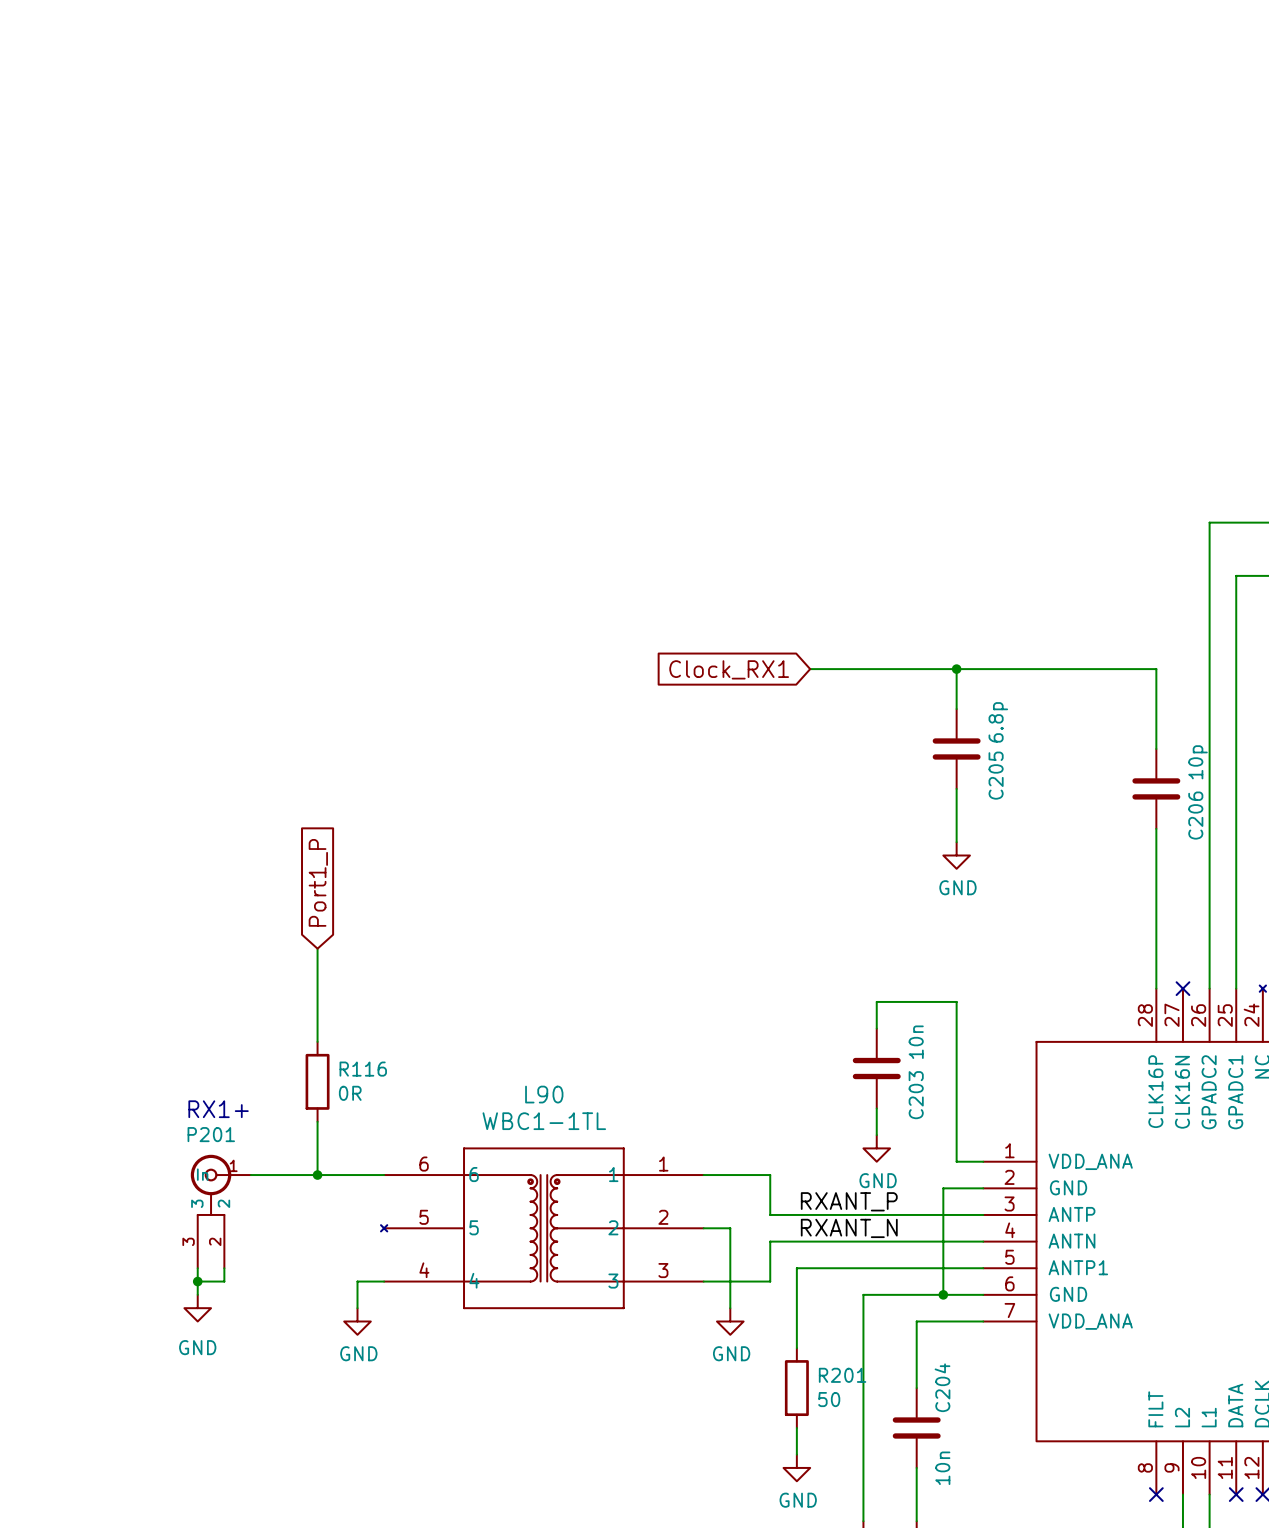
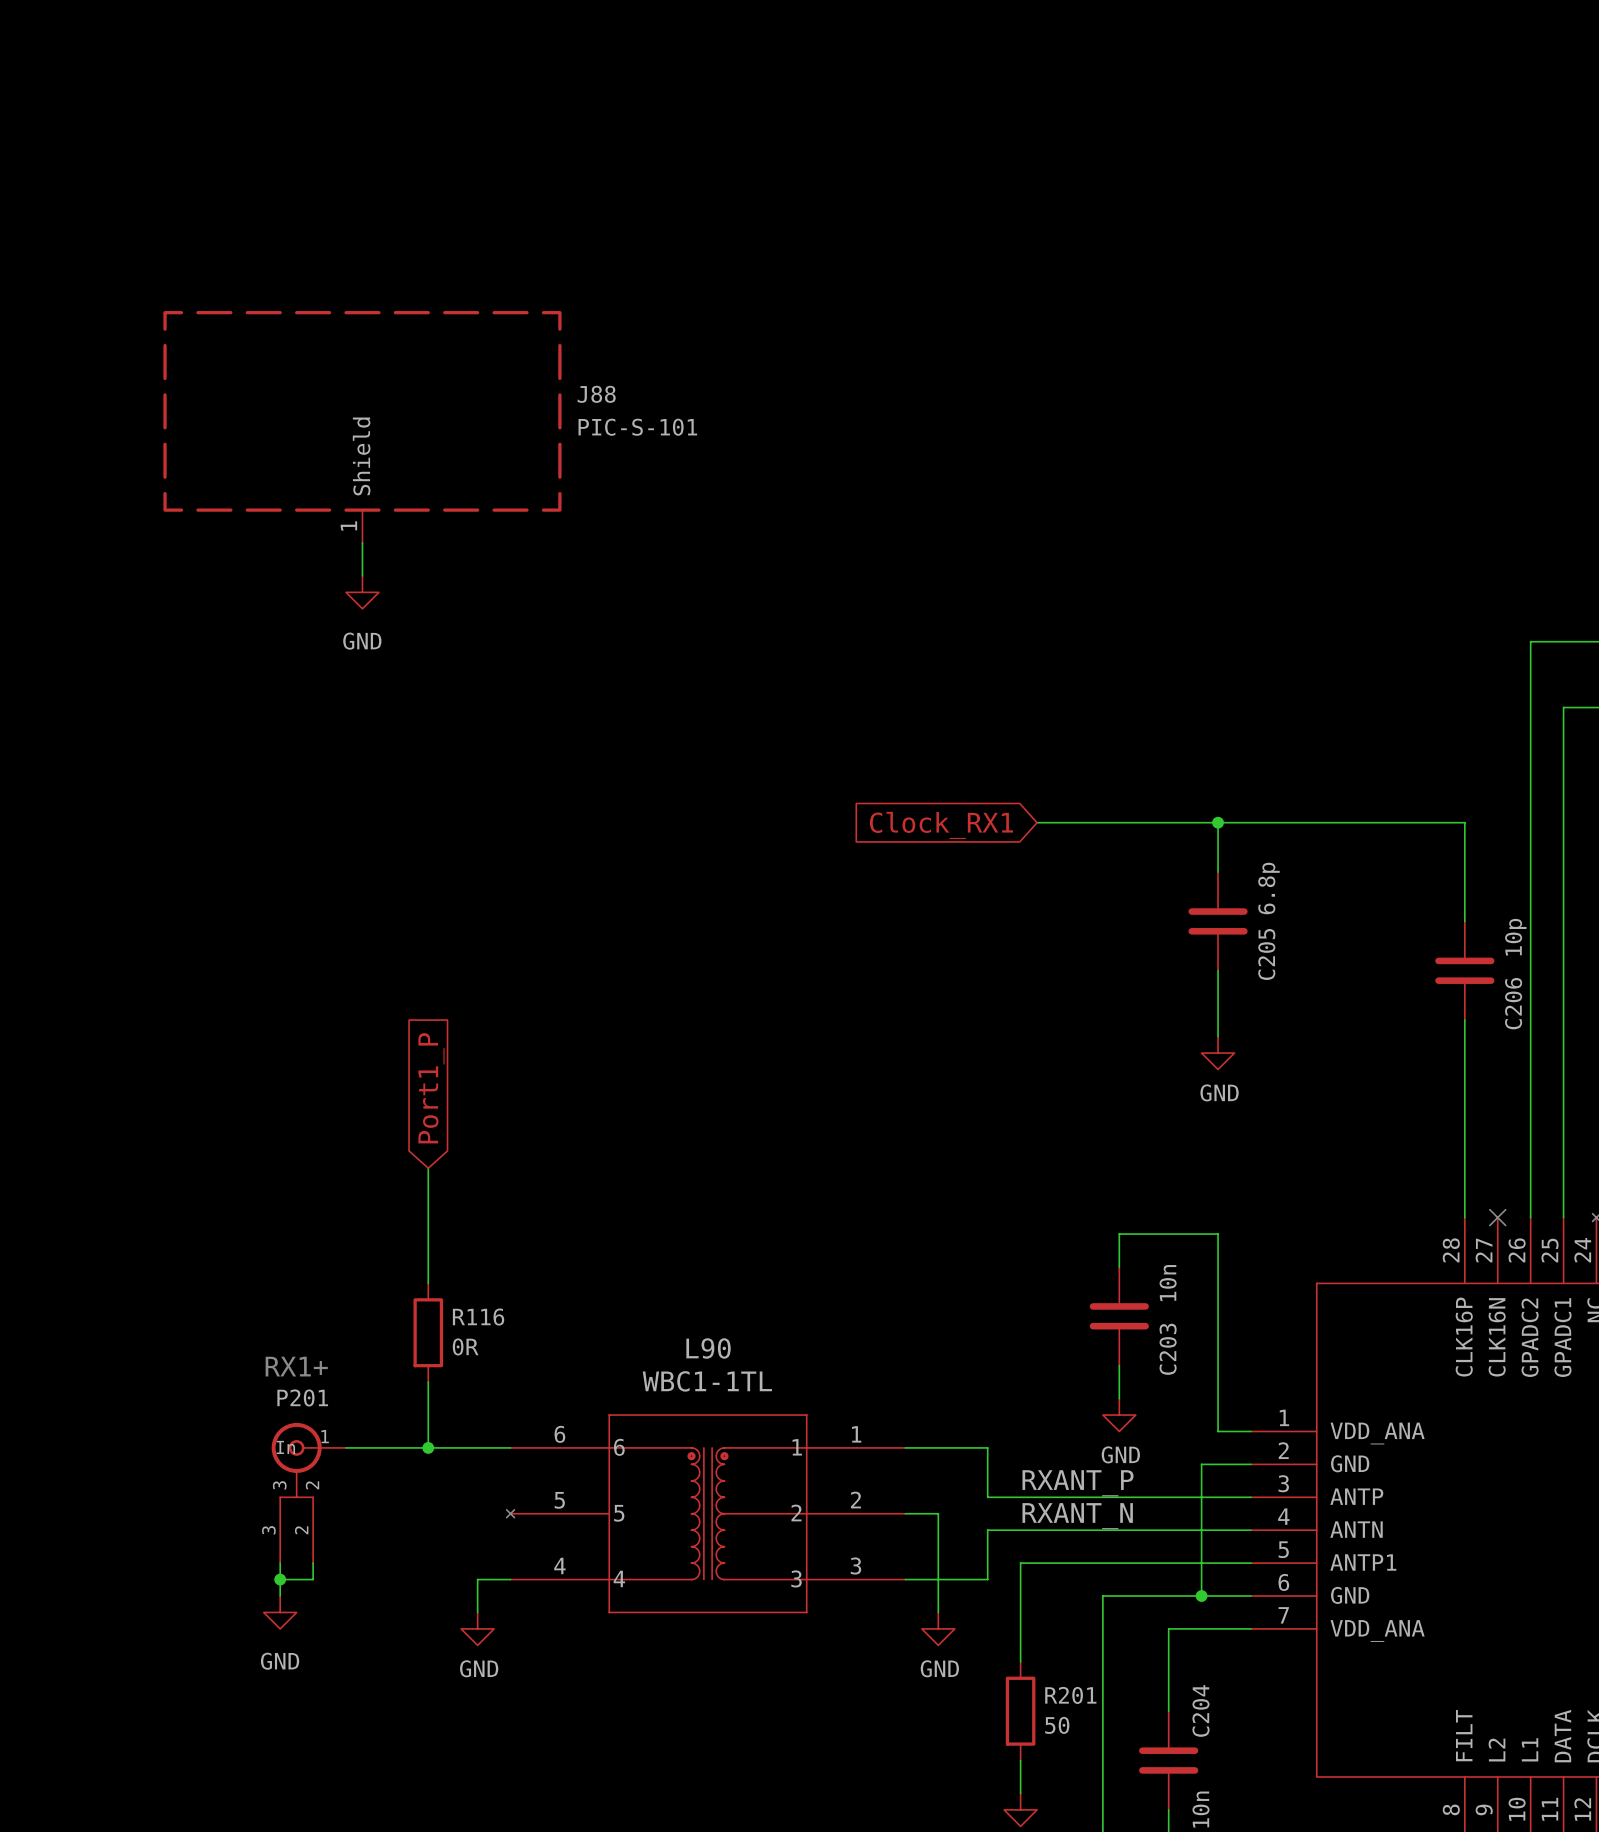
J88: none -> PIC-S-101 (362, 427)
wire: none -> (362, 543) (362, 575)
power symbol: none -> GND (362, 592)

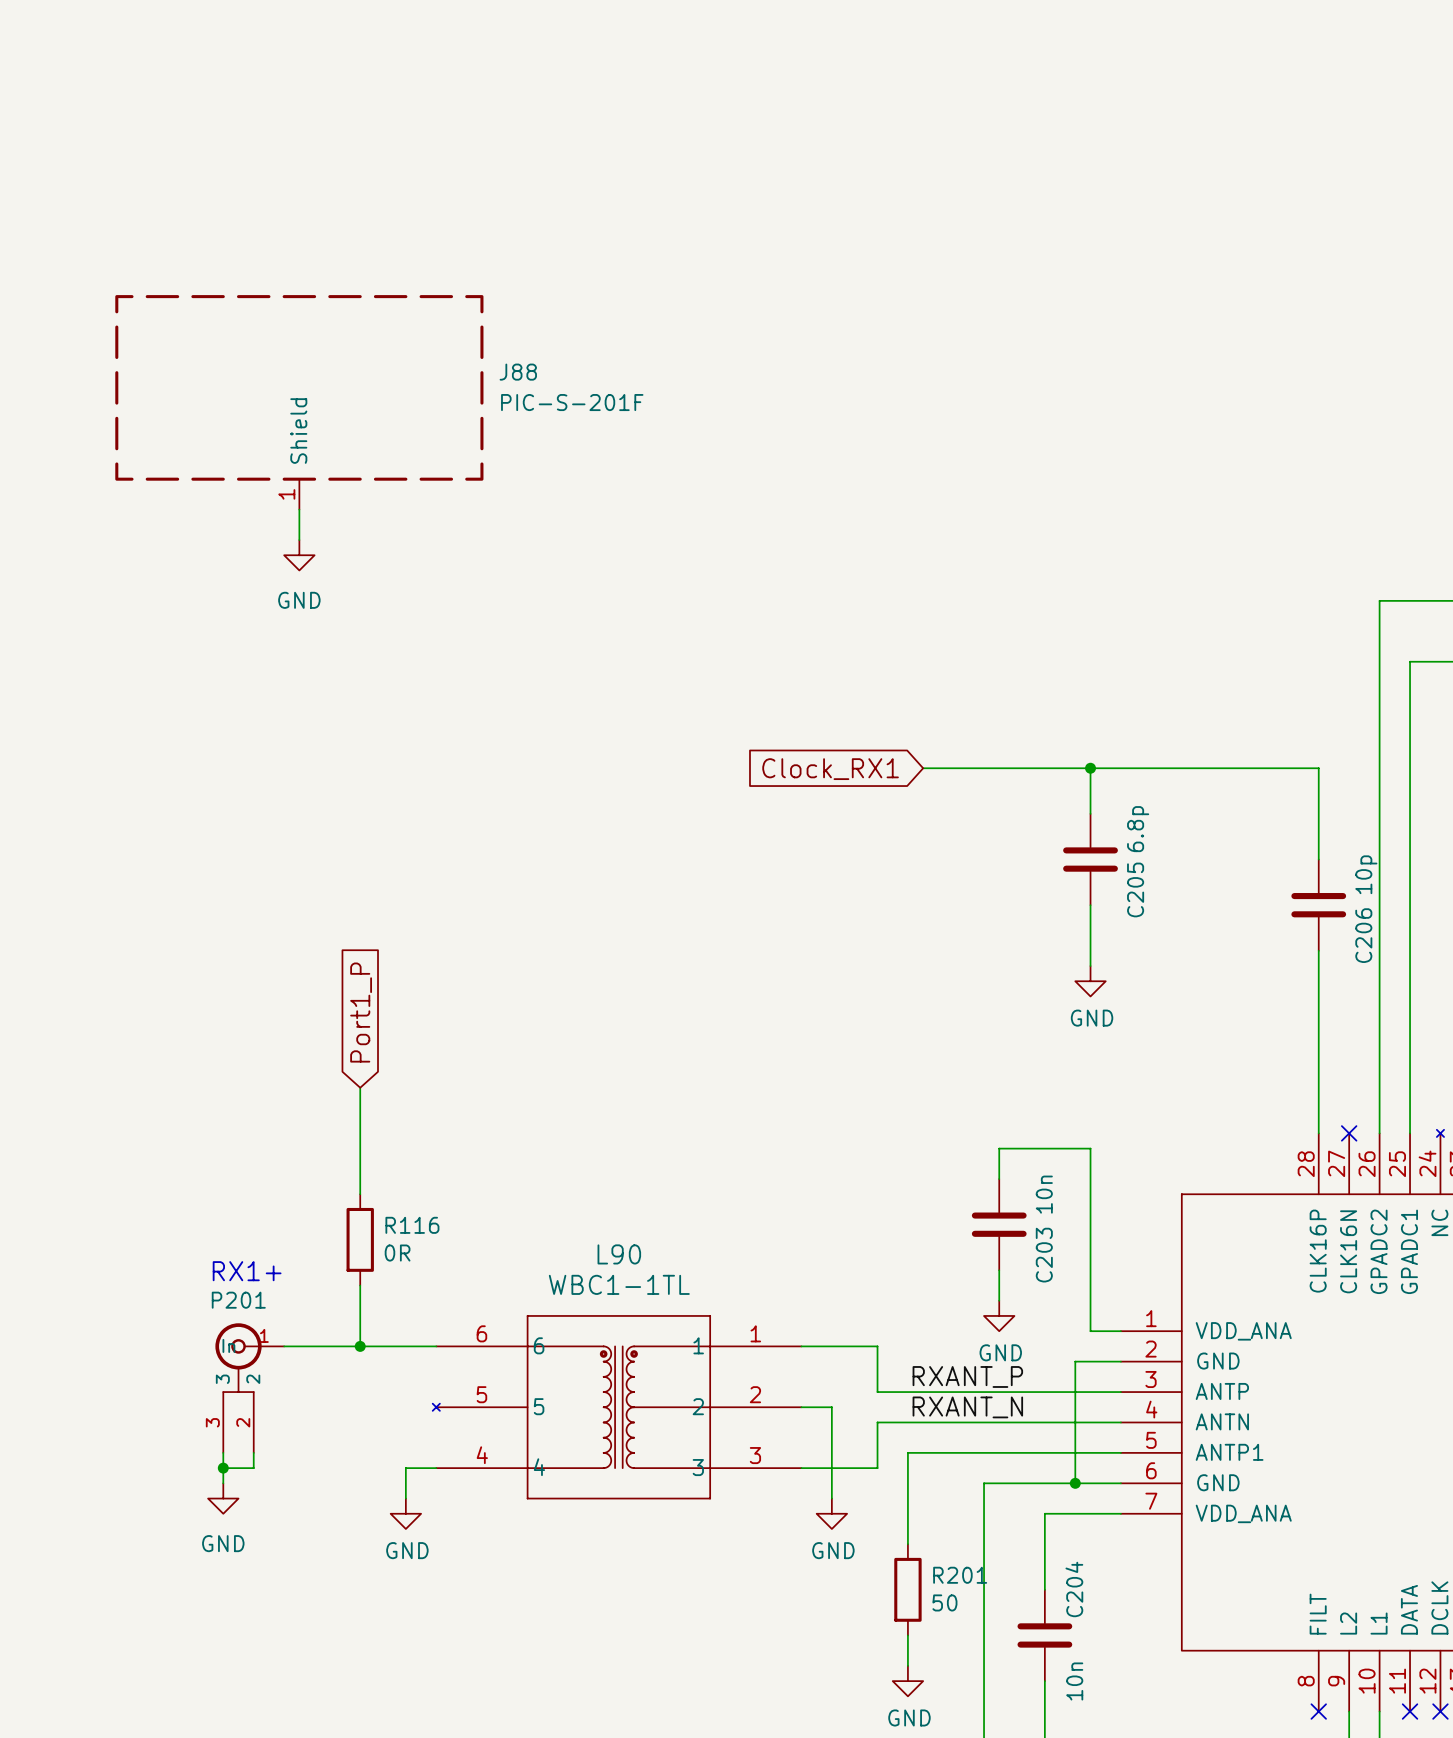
J88 value: PIC-S-101 (637, 427) -> PIC-S-201F (572, 402)

